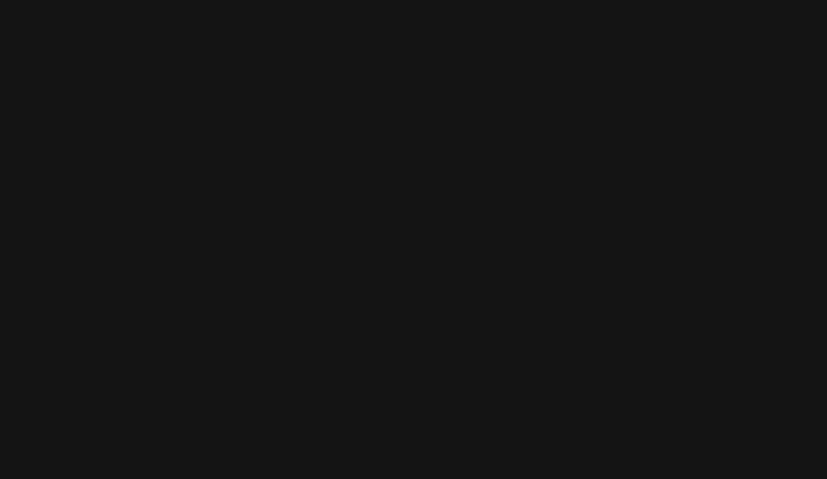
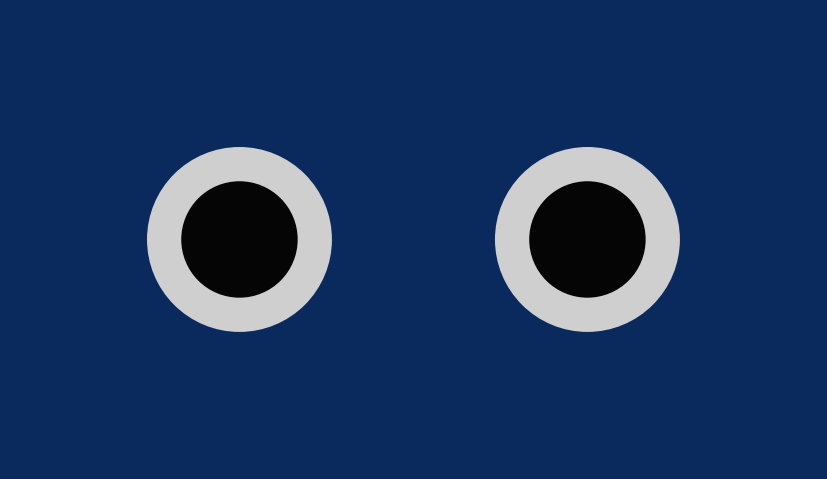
part: none -> (413, 239)

